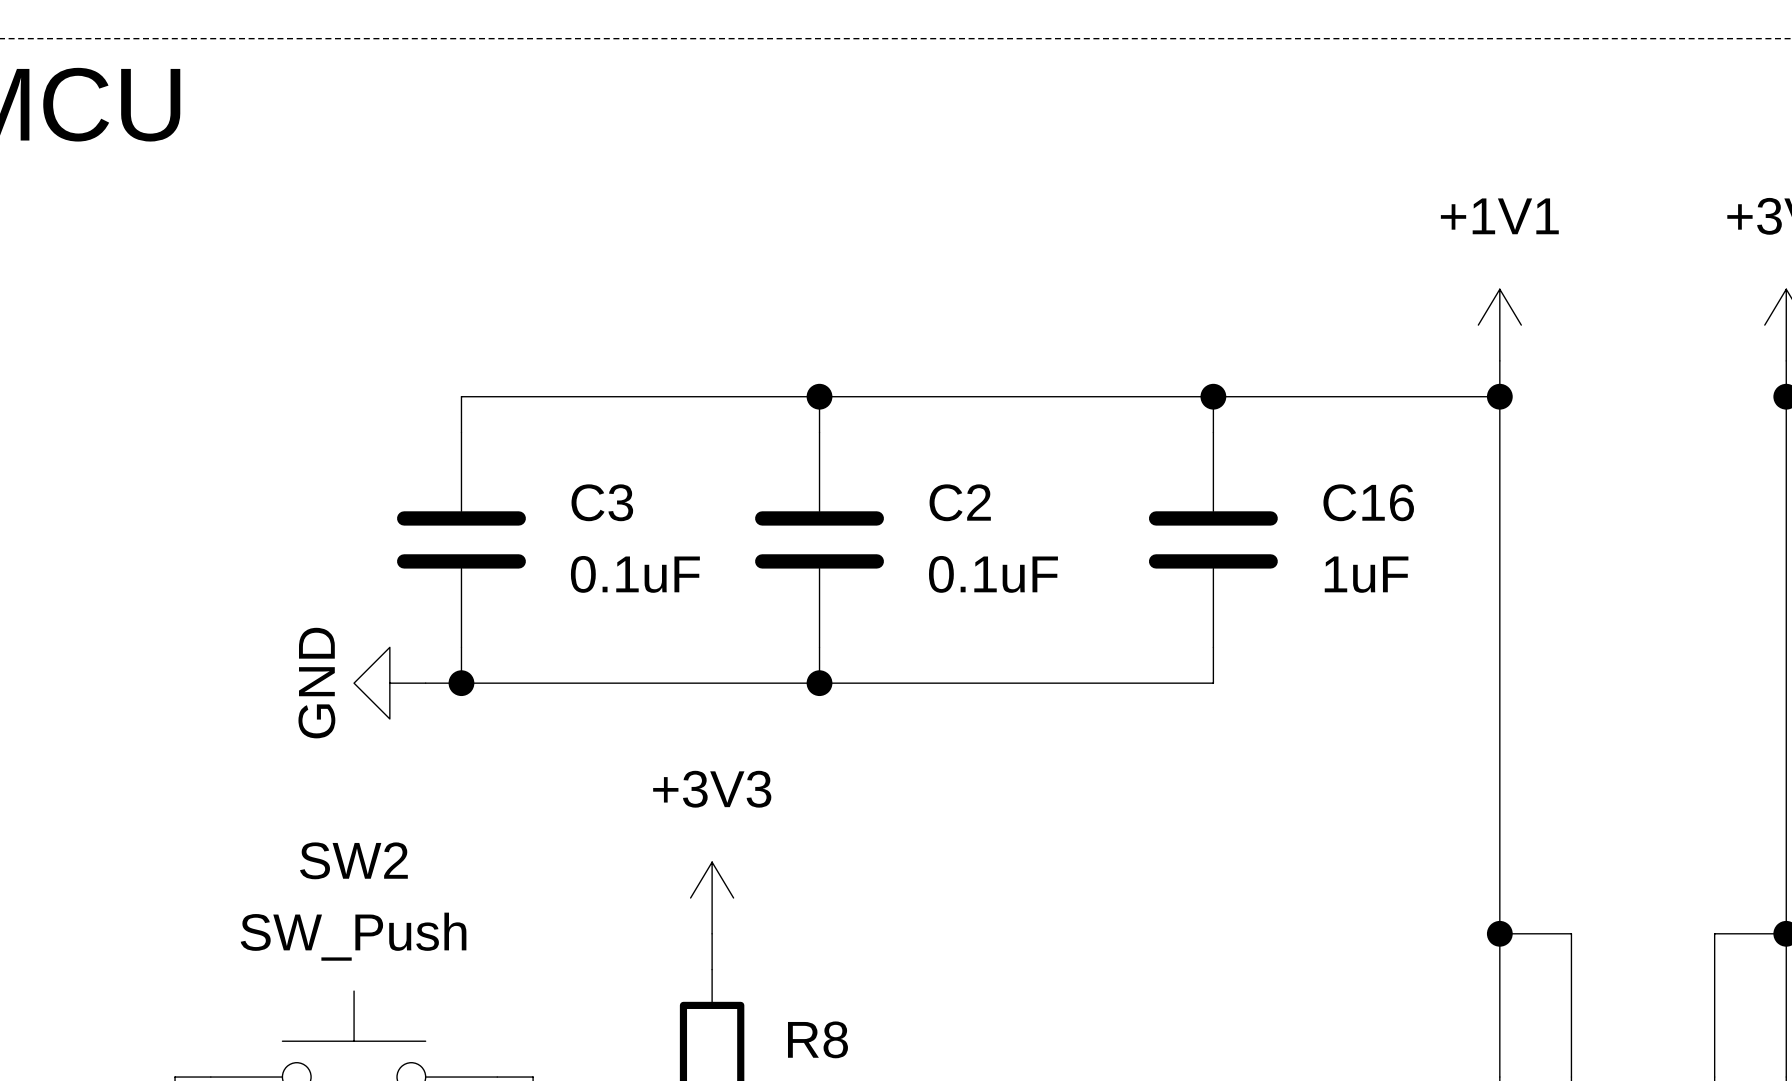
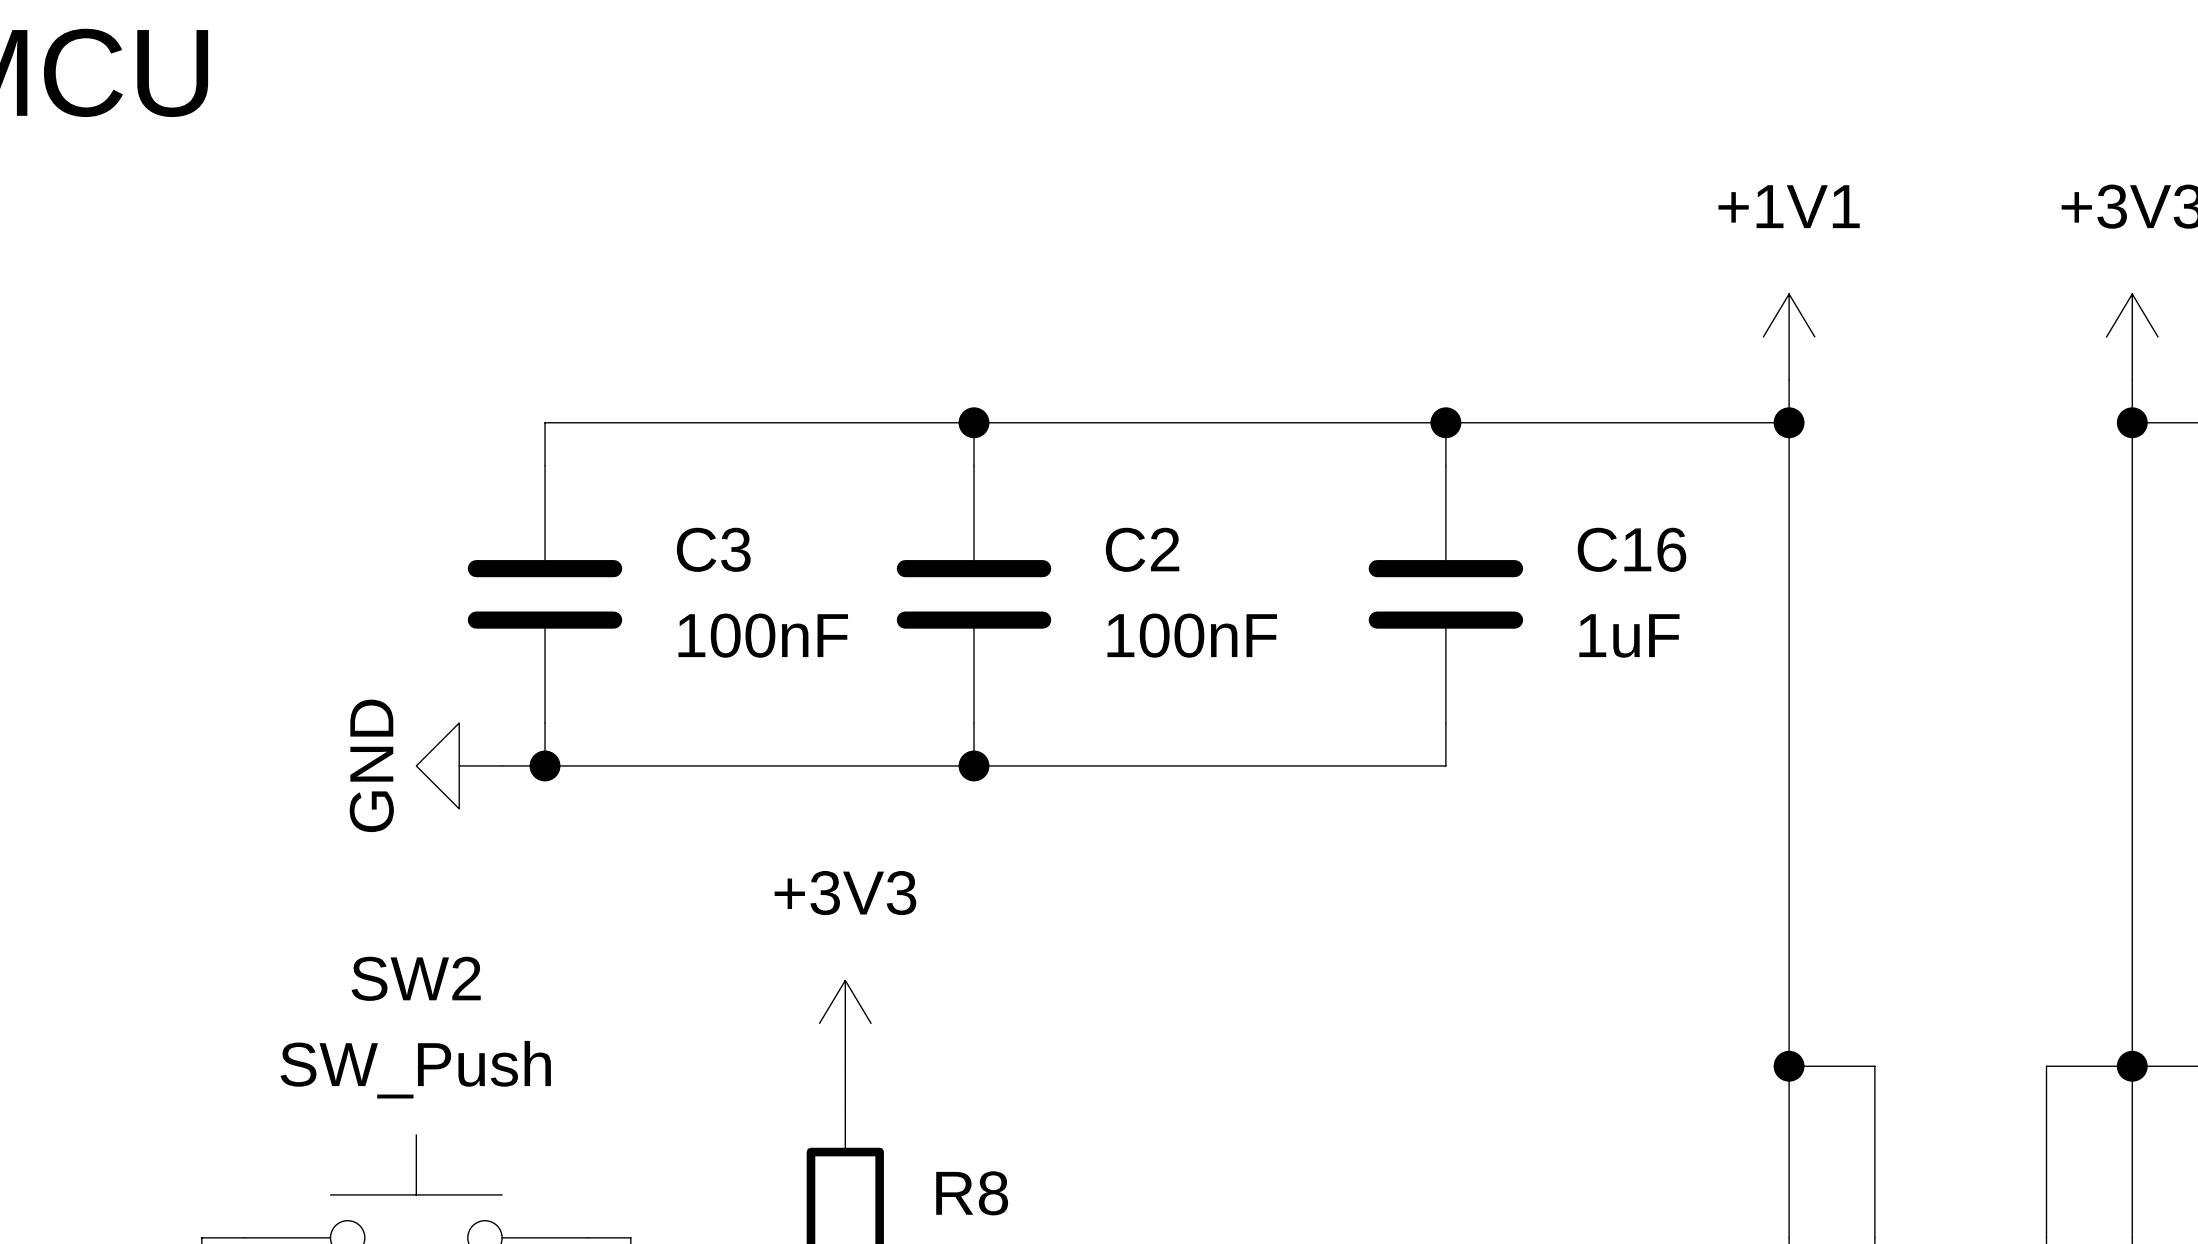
C3 value: 0.1uF (635, 574) -> 100nF (763, 635)
C2 value: 0.1uF (993, 574) -> 100nF (1192, 635)

